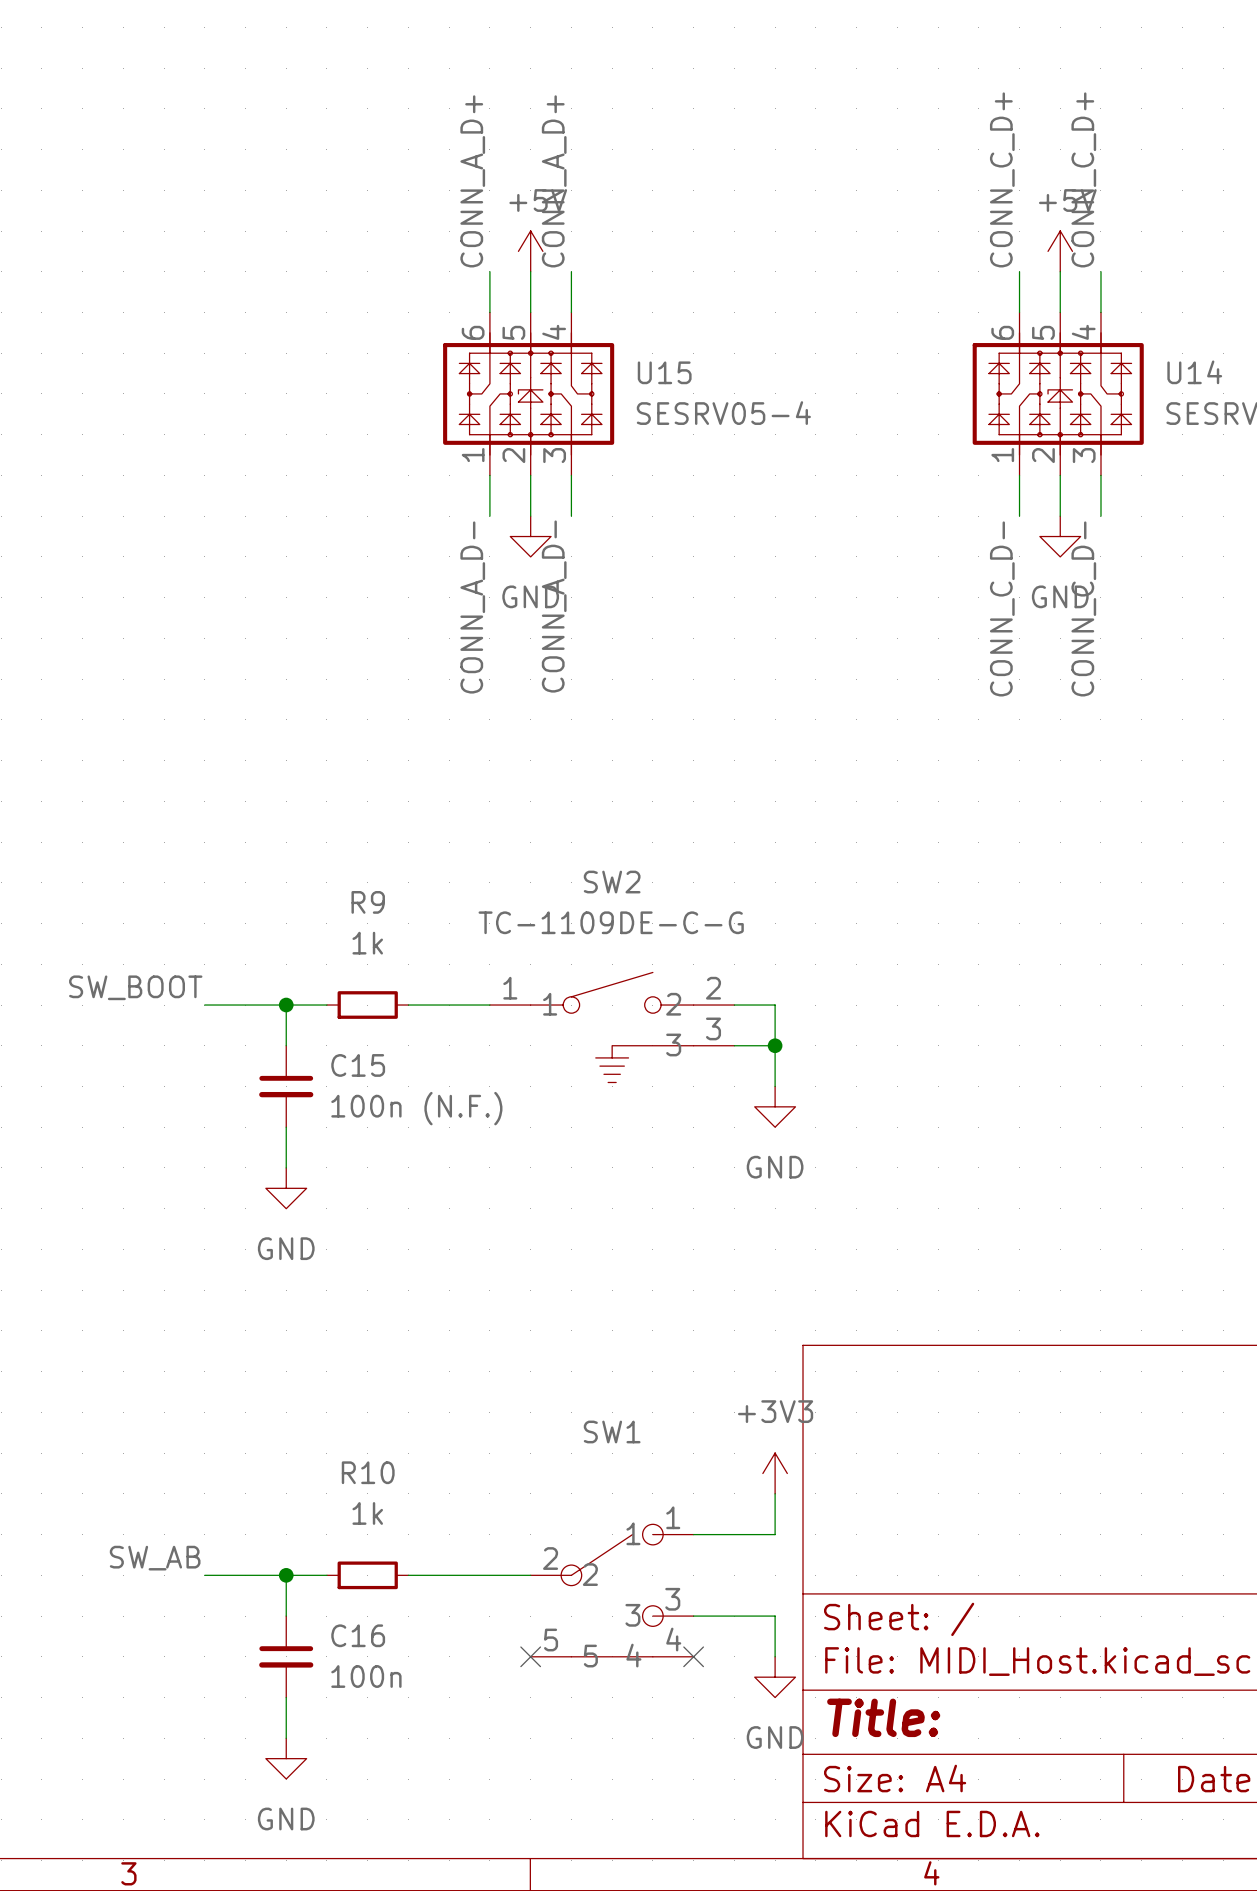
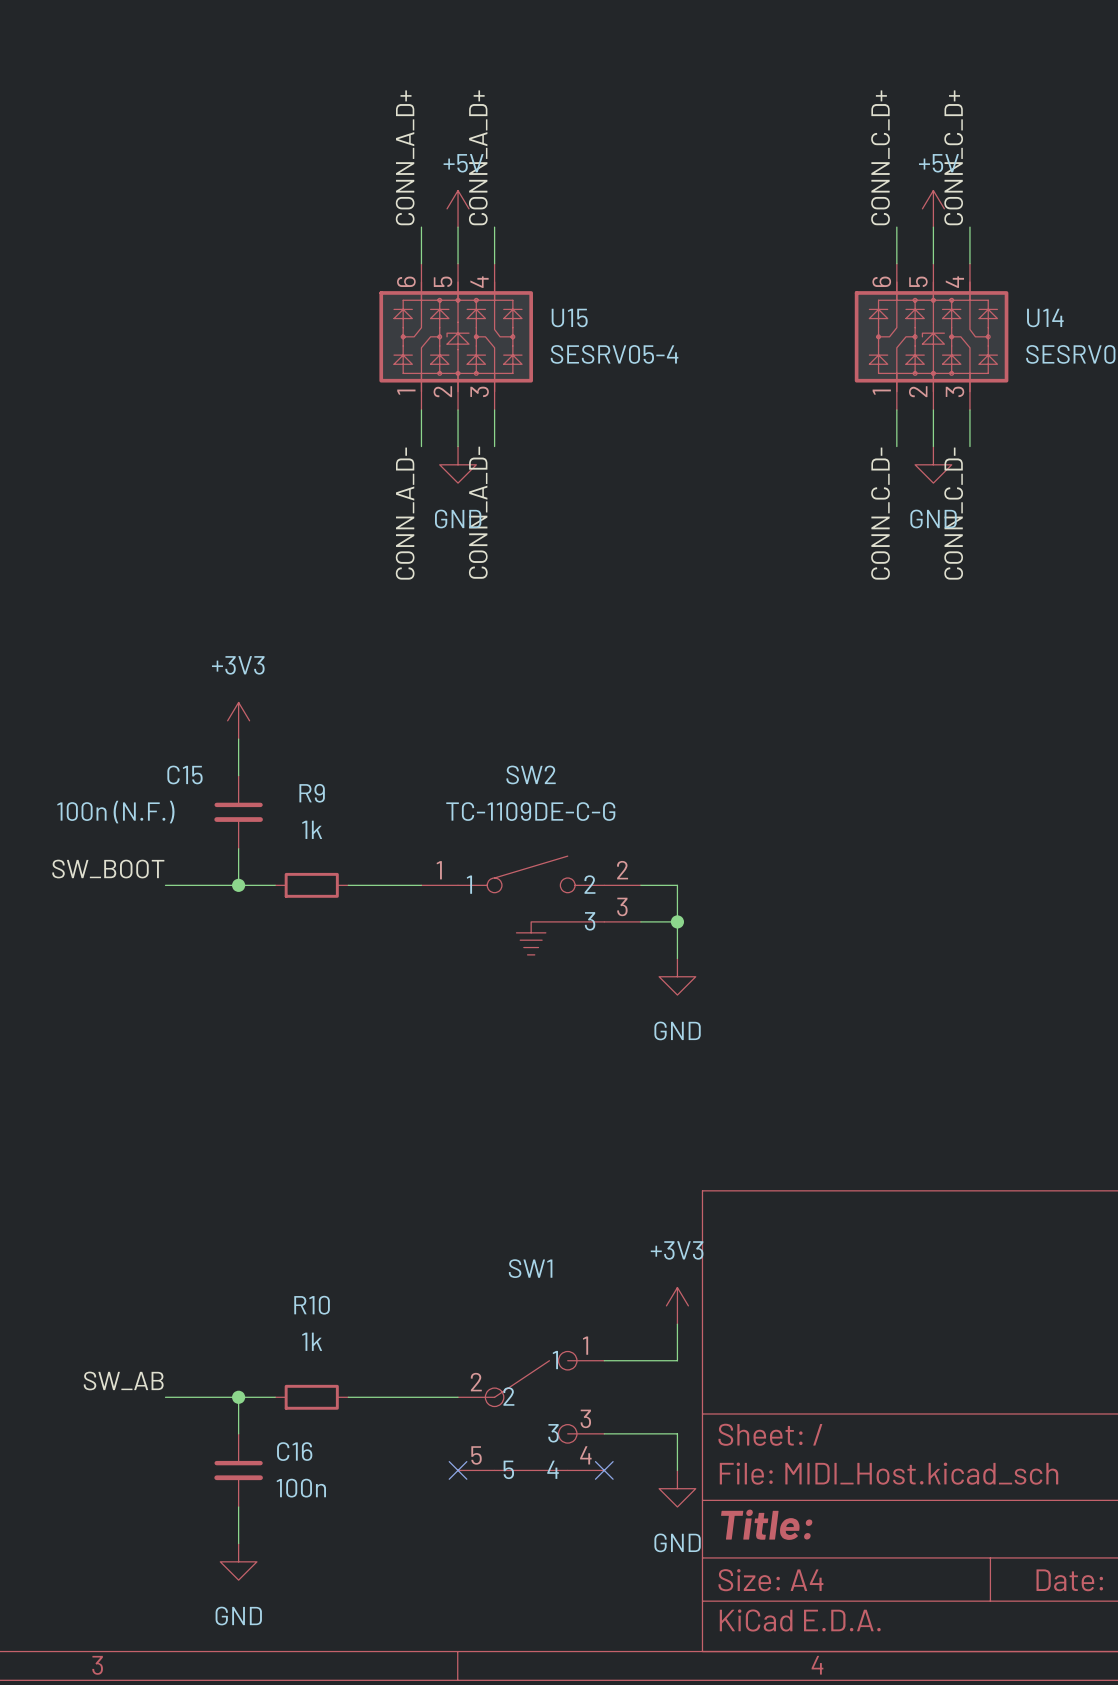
power symbol: none -> +3V3 (238, 720)
wire: (286, 1005) (286, 1045) -> (238, 885) (238, 848)
C15 name position: C15 (358, 1065) -> C15 (184, 774)
C15 position: (286, 1086) -> (238, 812)
C15 value position: 100n (N.F.) (416, 1108) -> 100n (N.F.) (115, 812)
wire: (286, 1127) (286, 1167) -> (238, 739) (238, 775)
power symbol: GND (286, 1188) -> none

